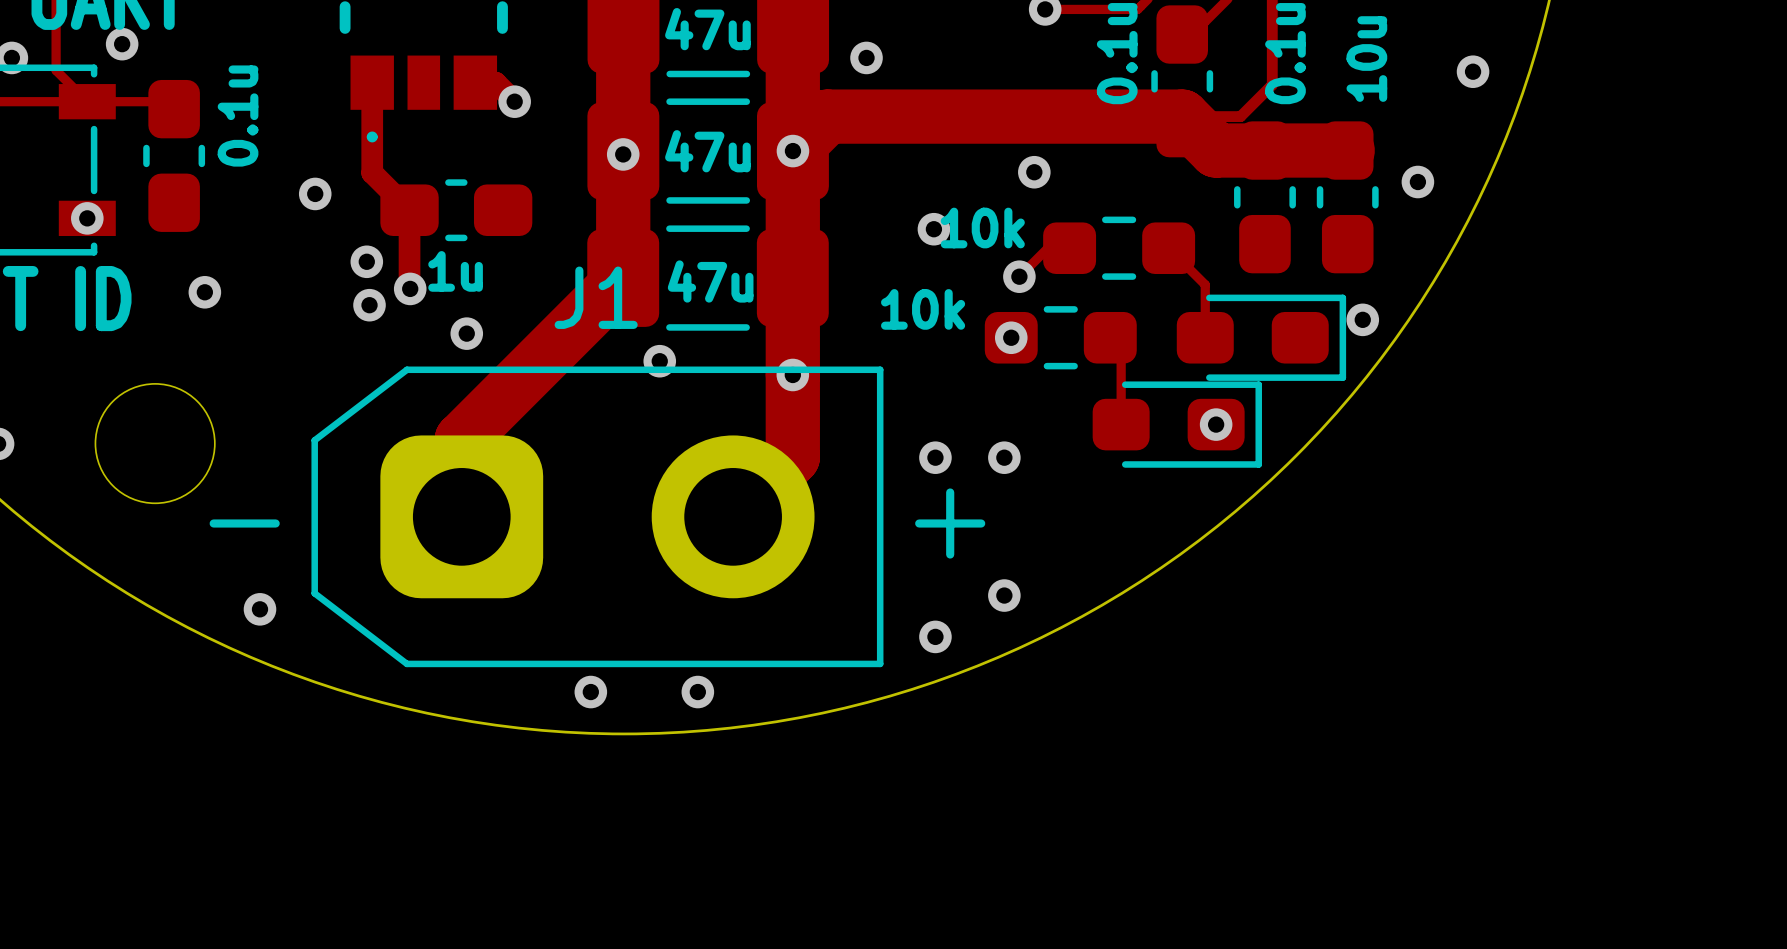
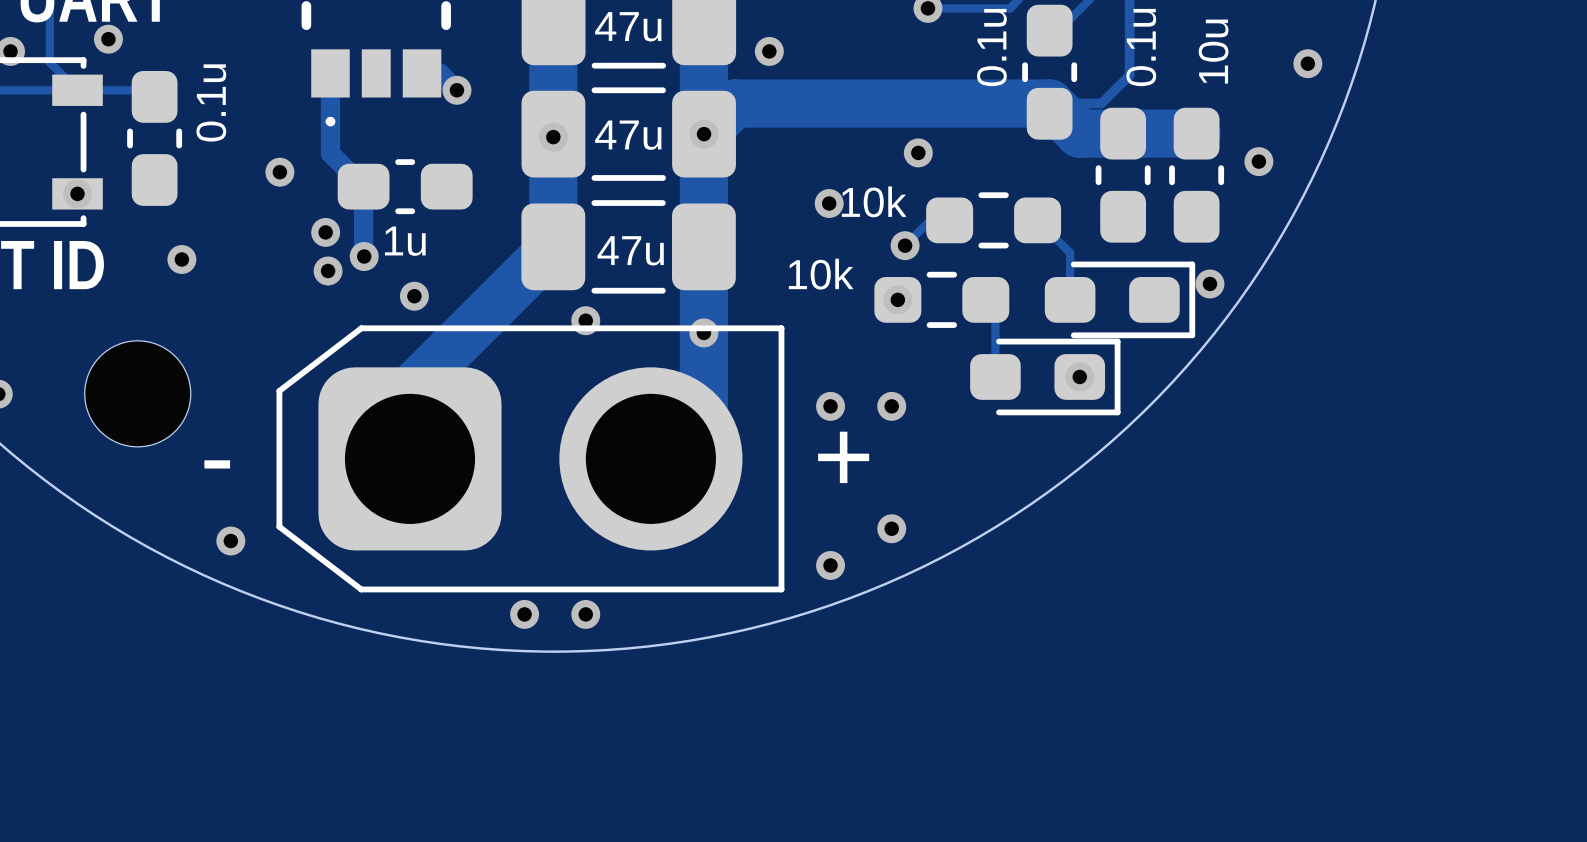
J1: (597, 516) -> none
part: none -> (530, 458)
via position: (697, 692) -> (585, 614)

